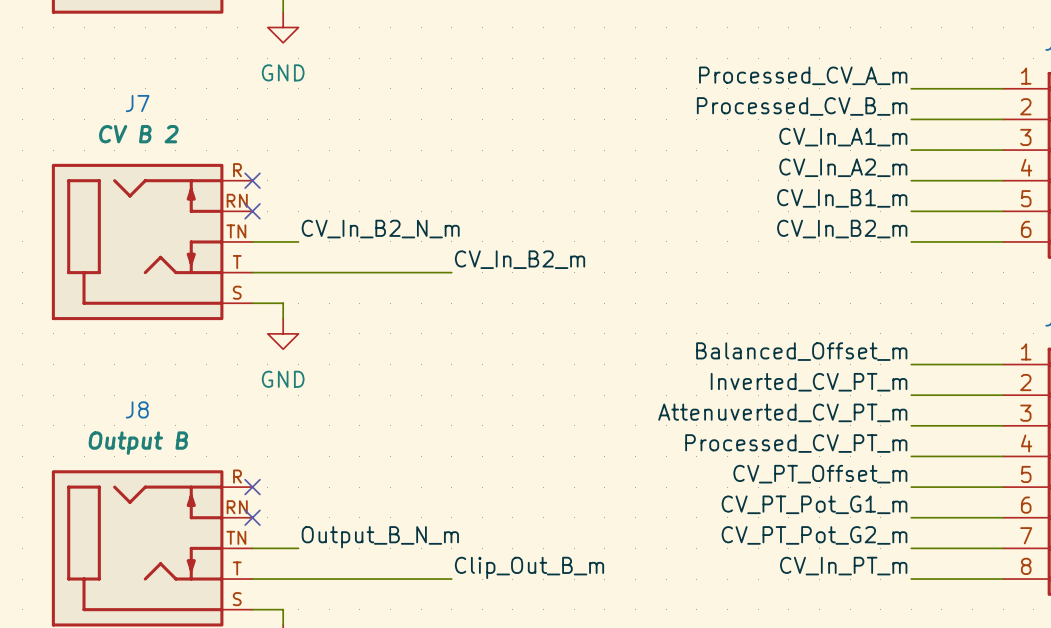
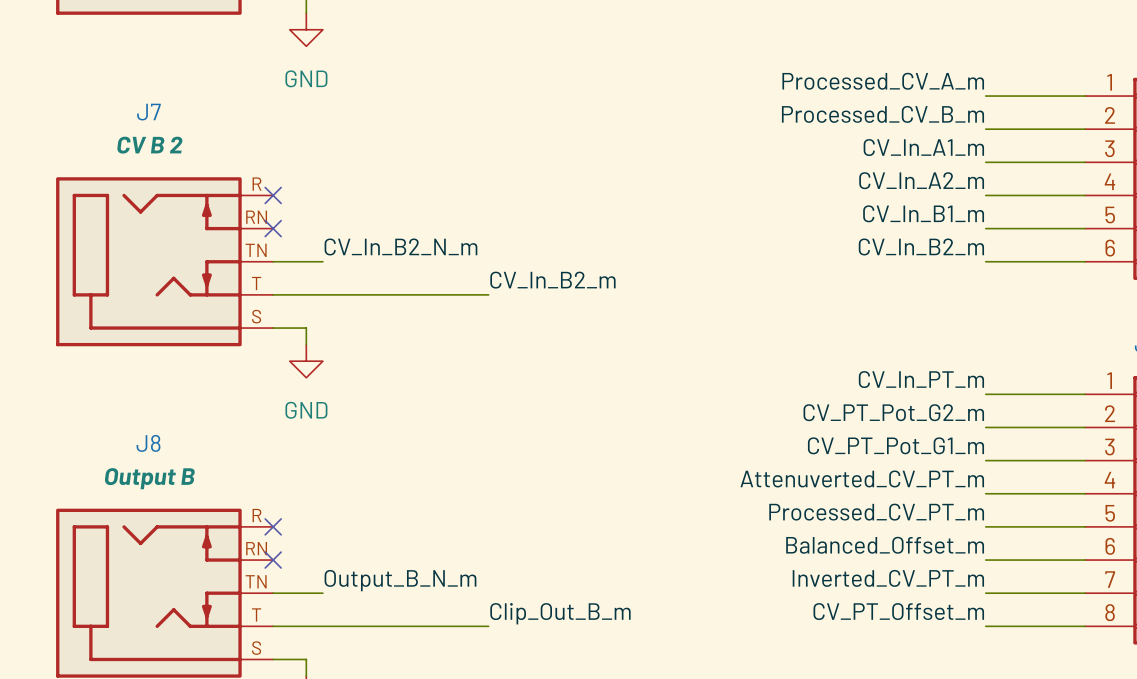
label: Balanced_Offset_m (801, 351) -> CV_In_PT_m (921, 379)
label: Inverted_CV_PT_m (809, 382) -> CV_PT_Pot_G2_m (893, 412)
label: Attenuverted_CV_PT_m (782, 412) -> CV_PT_Pot_G1_m (895, 445)
label: Processed_CV_PT_m (796, 443) -> Attenuverted_CV_PT_m (862, 478)
label: CV_PT_Offset_m (820, 474) -> Processed_CV_PT_m (876, 512)
label: CV_PT_Pot_G1_m (814, 504) -> Balanced_Offset_m (885, 545)
label: CV_PT_Pot_G2_m (814, 535) -> Inverted_CV_PT_m (888, 578)
label: CV_In_PT_m (843, 566) -> CV_PT_Offset_m (898, 611)

